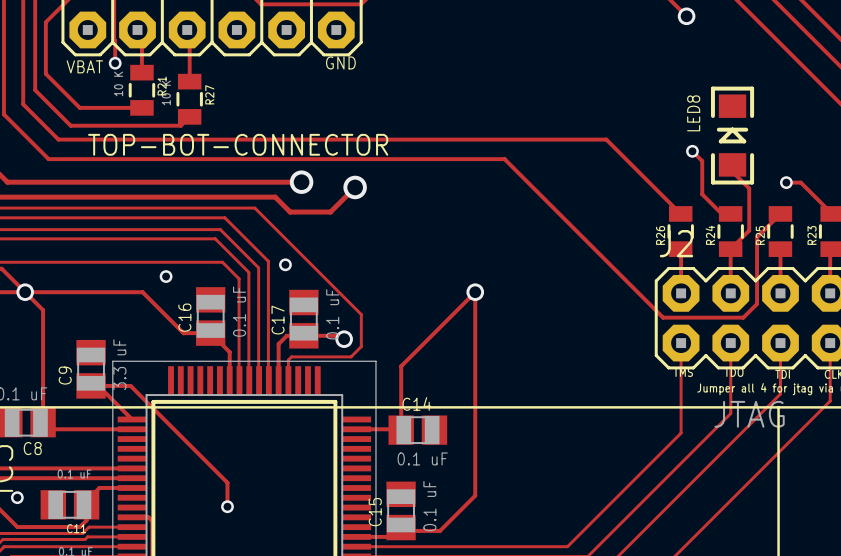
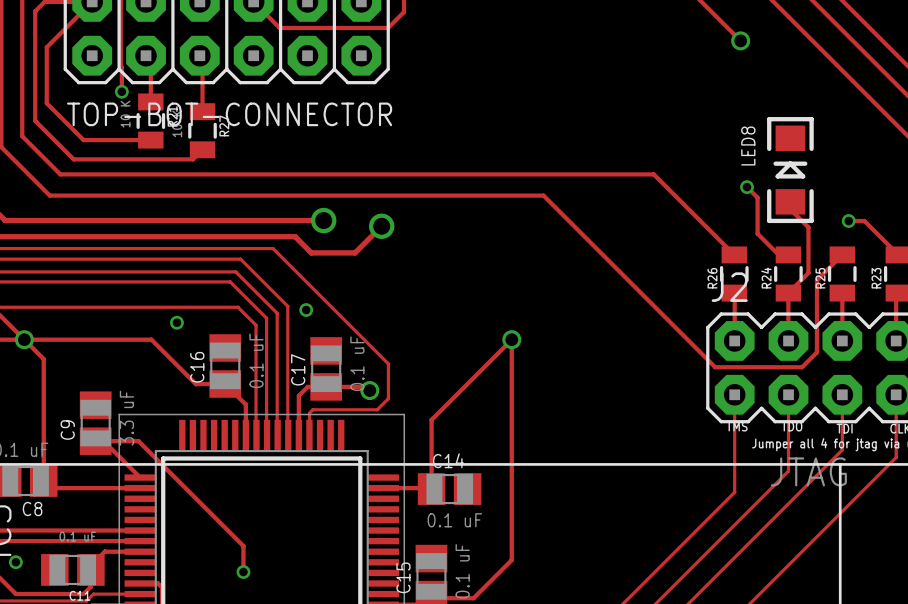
text: GND (340, 62) -> none
text: VBAT (84, 66) -> none
TOP-BOT-CONNECTOR name position: TOP-BOT-CONNECTOR (238, 144) -> TOP-BOT-CONNECTOR (229, 114)

